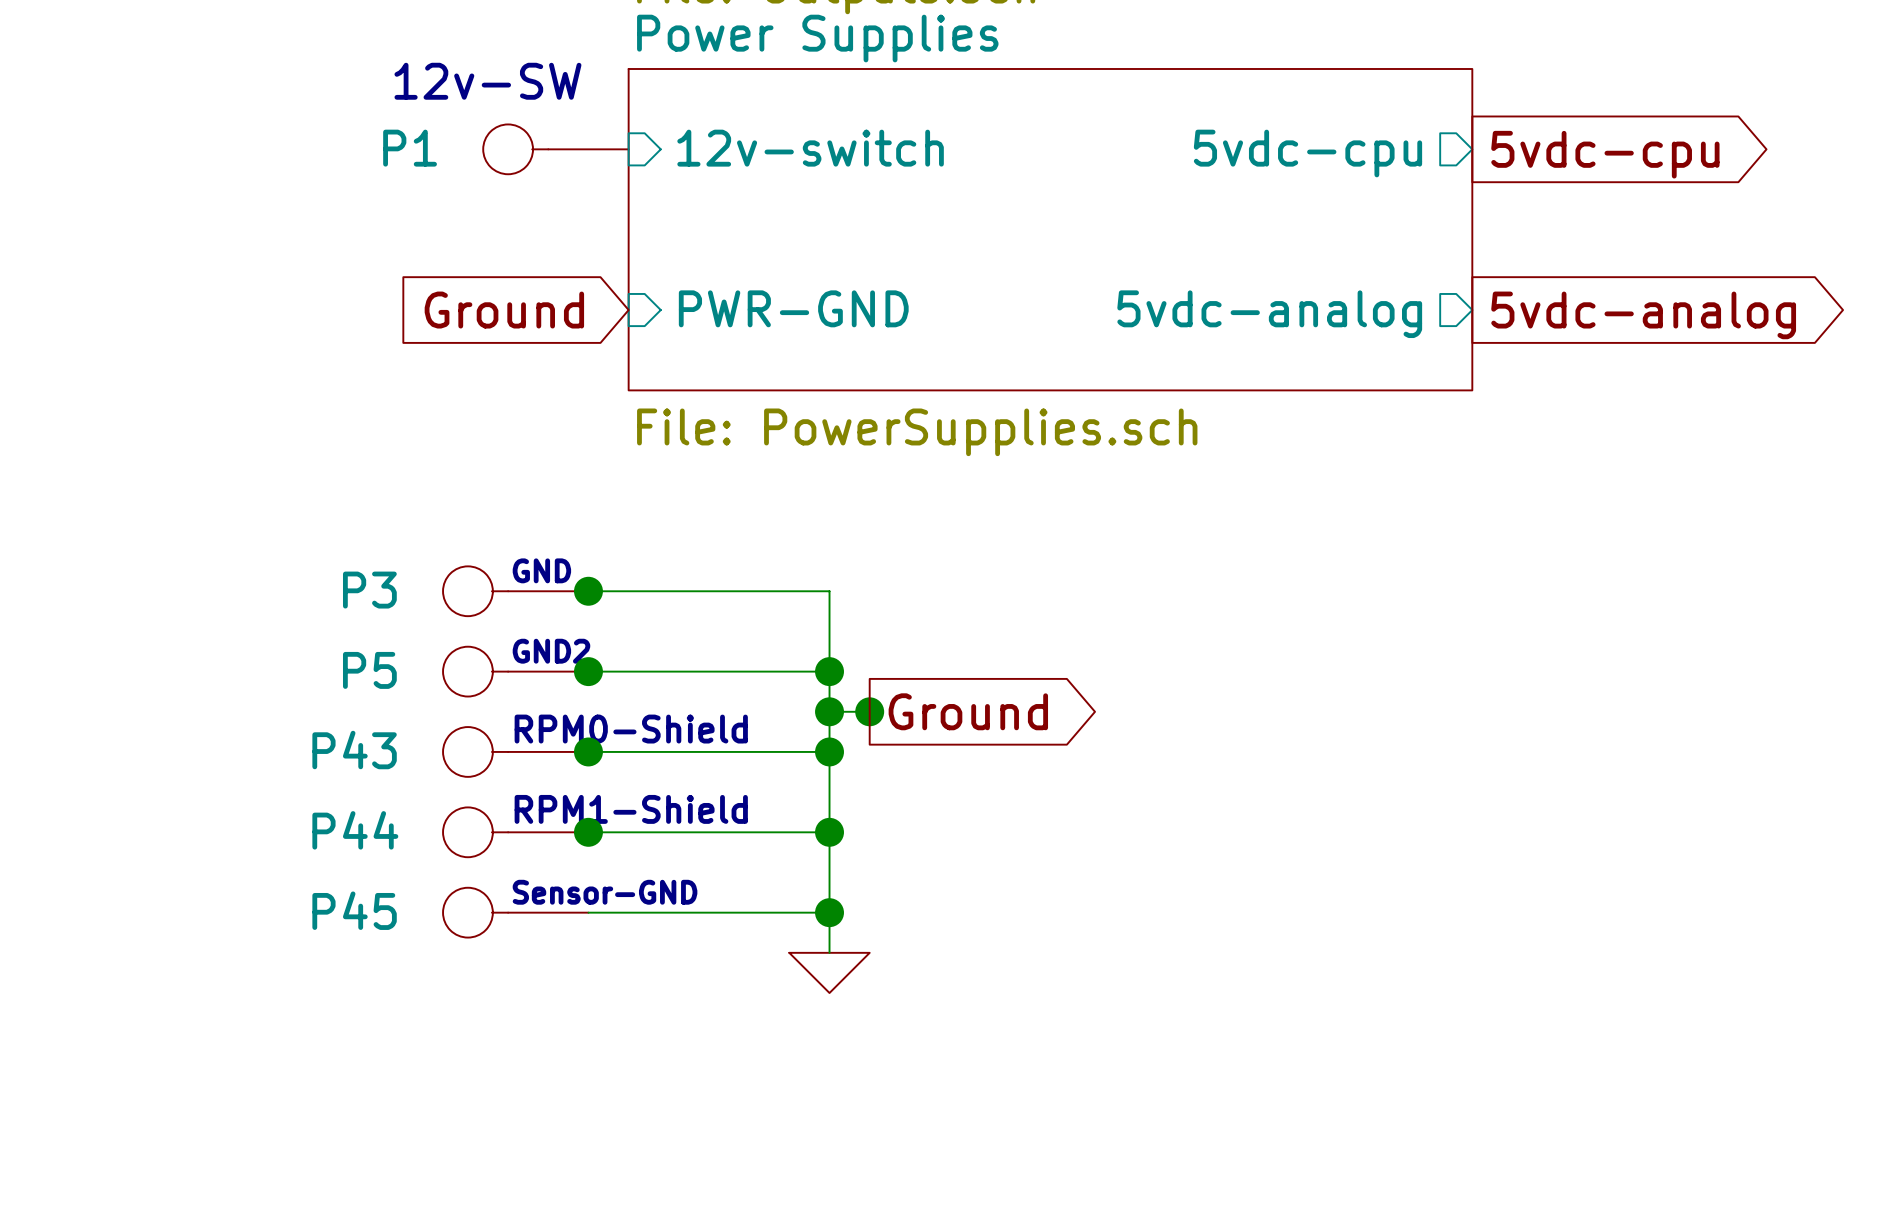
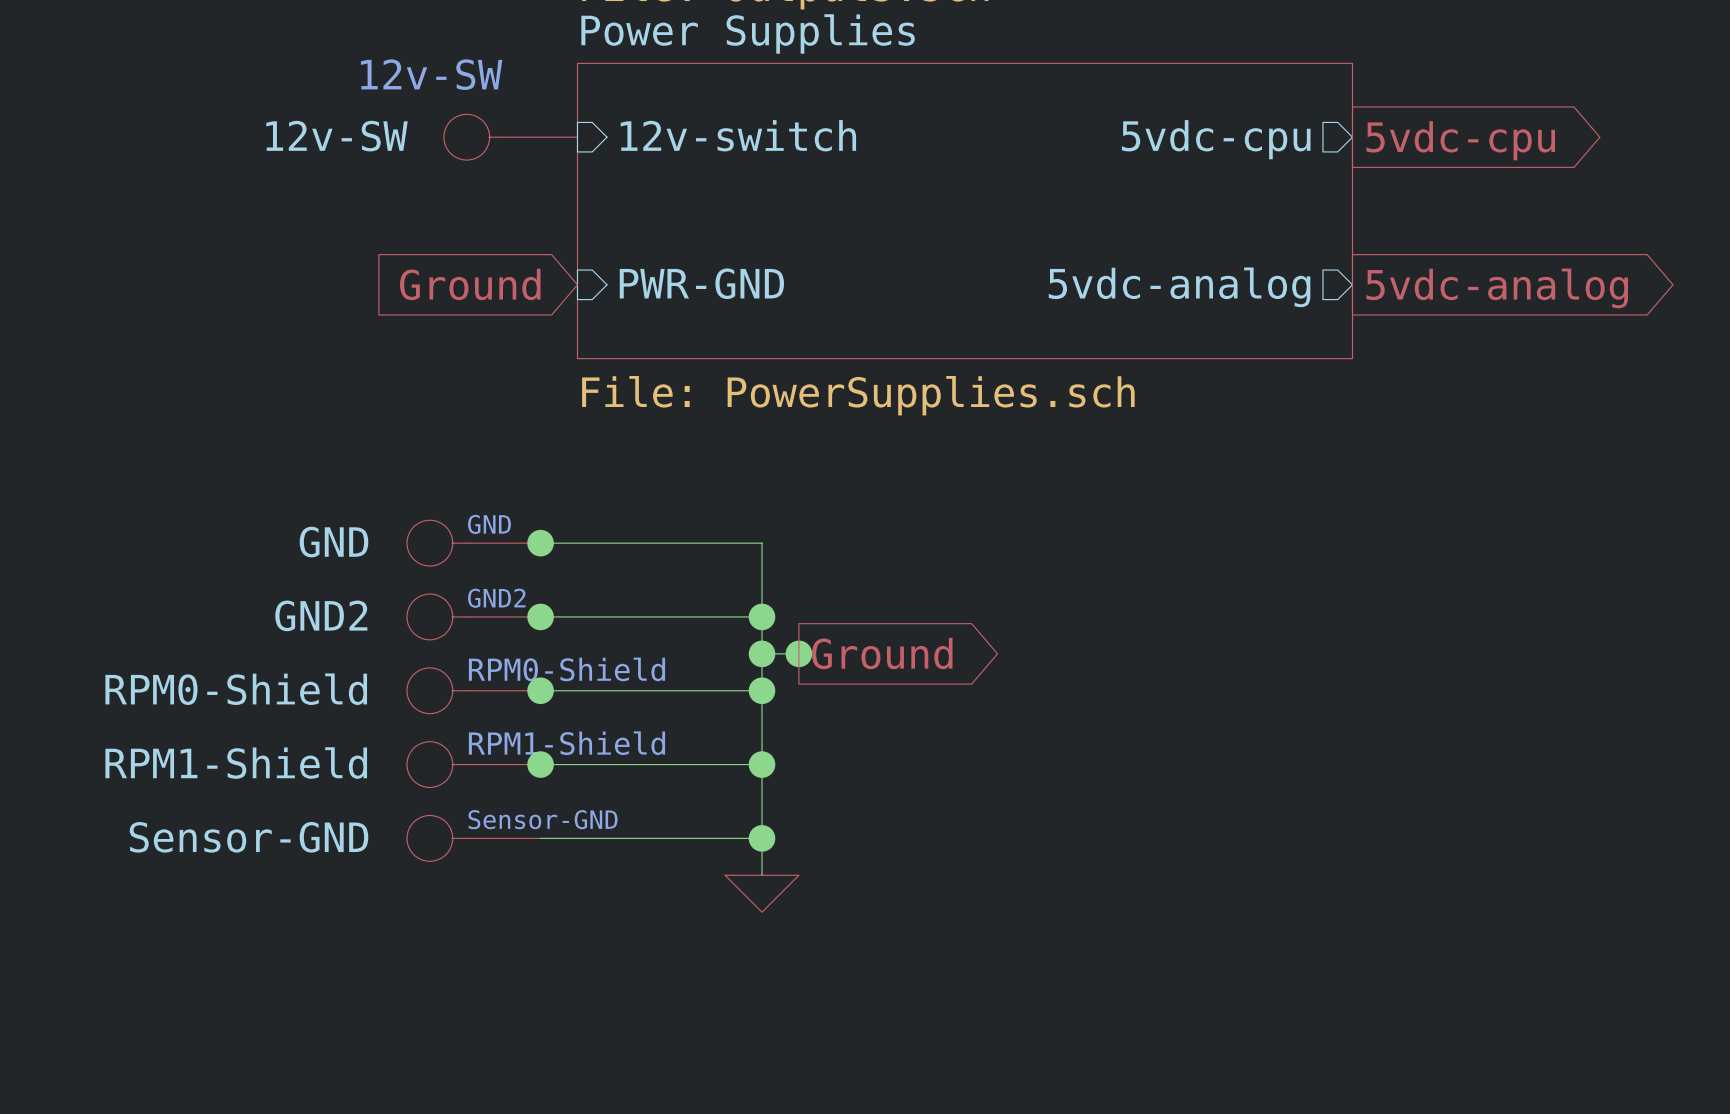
P1 name: P1 (410, 148) -> 12v-SW (337, 136)
P3 name: P3 (369, 590) -> GND (333, 542)
P5 name: P5 (369, 670) -> GND2 (321, 615)
P43 name: P43 (354, 750) -> RPM0-Shield (236, 689)
P44 name: P44 (355, 830) -> RPM1-Shield (236, 763)
P45 name: P45 (354, 910) -> Sensor-GND (249, 837)

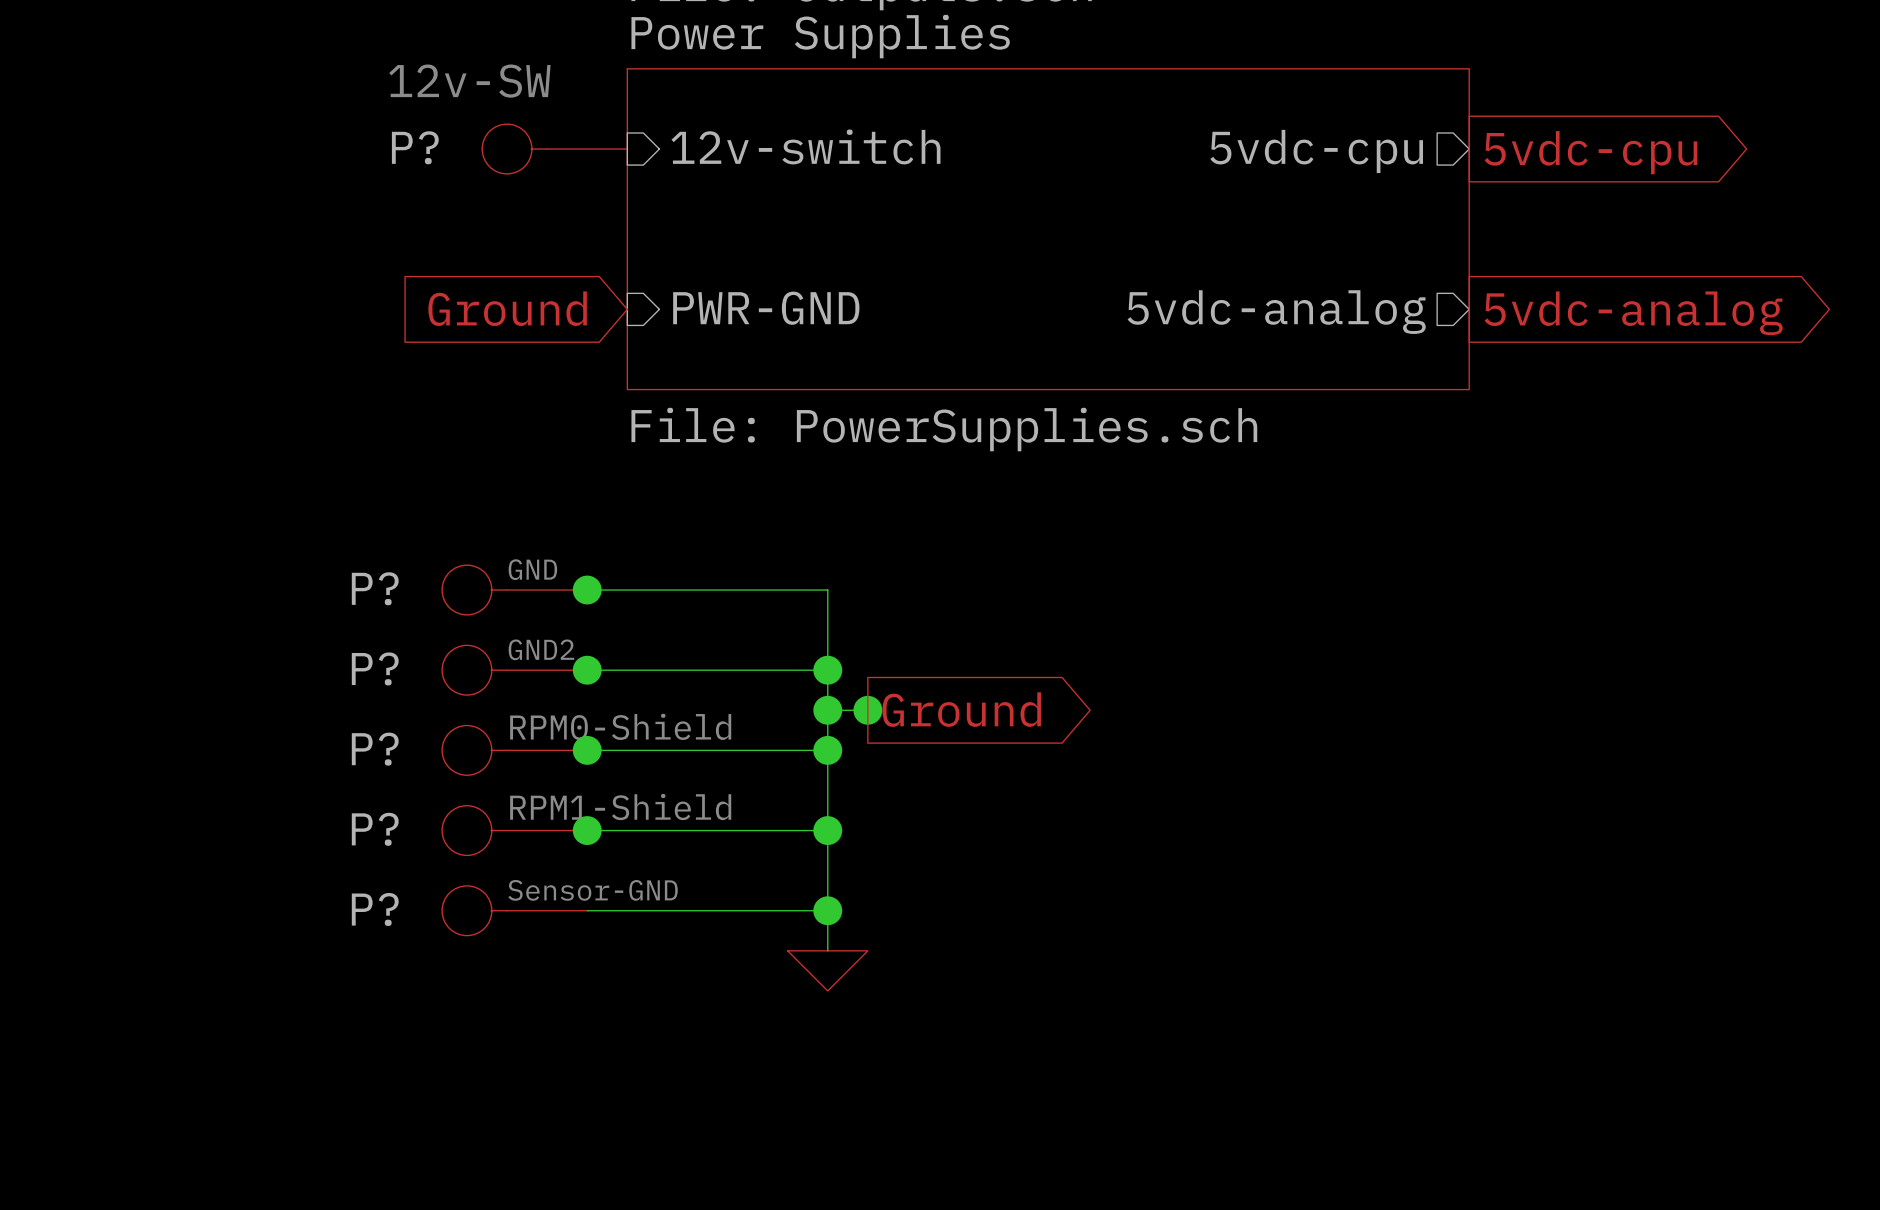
12v-SW name: 12v-SW (337, 136) -> P? (415, 147)
GND name: GND (333, 542) -> P? (375, 588)
GND2 name: GND2 (321, 615) -> P? (375, 668)
RPM0-Shield name: RPM0-Shield (236, 689) -> P? (375, 749)
RPM1-Shield name: RPM1-Shield (236, 763) -> P? (375, 829)
Sensor-GND name: Sensor-GND (249, 837) -> P? (375, 909)

